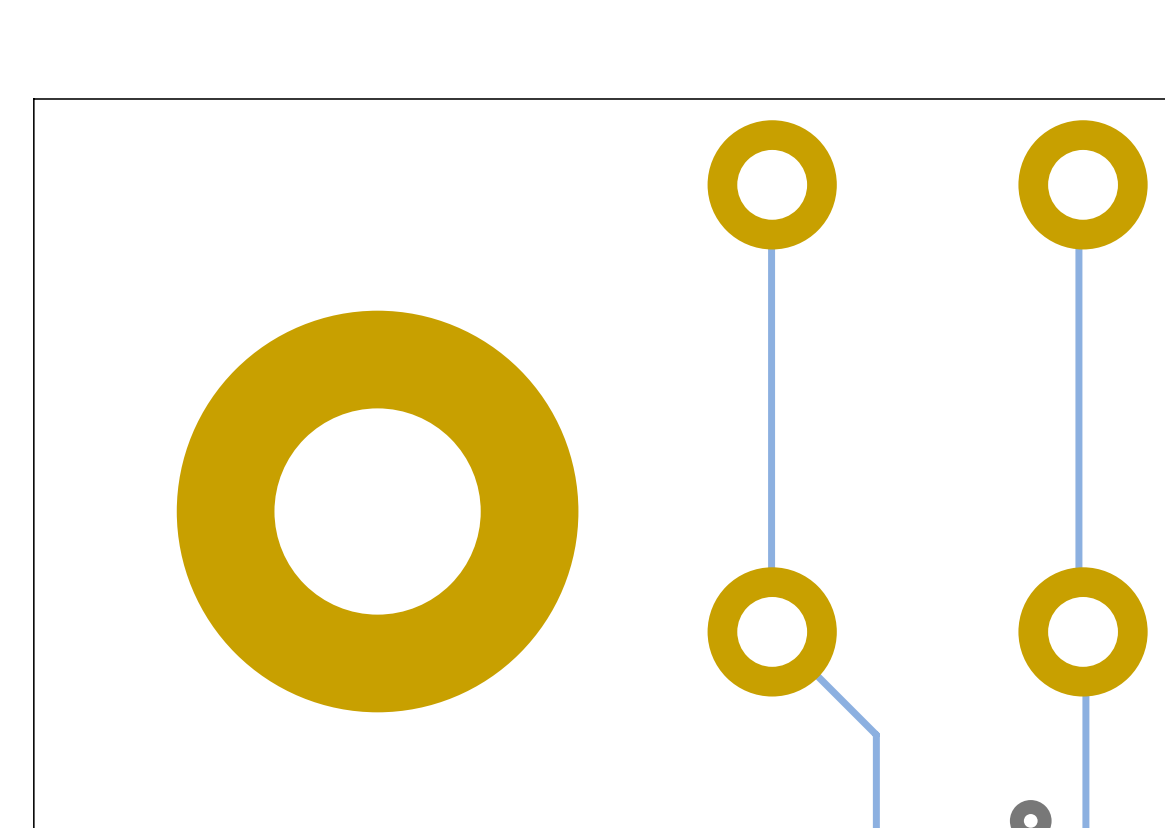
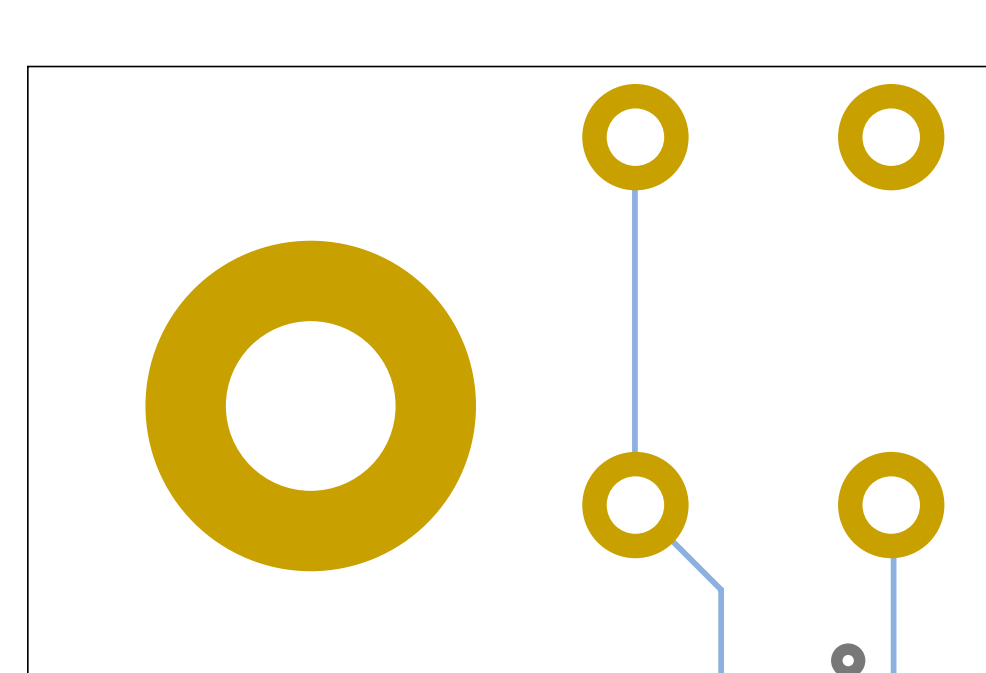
track: (1083, 184) (1078, 190) (1078, 630) (1083, 631) -> none

